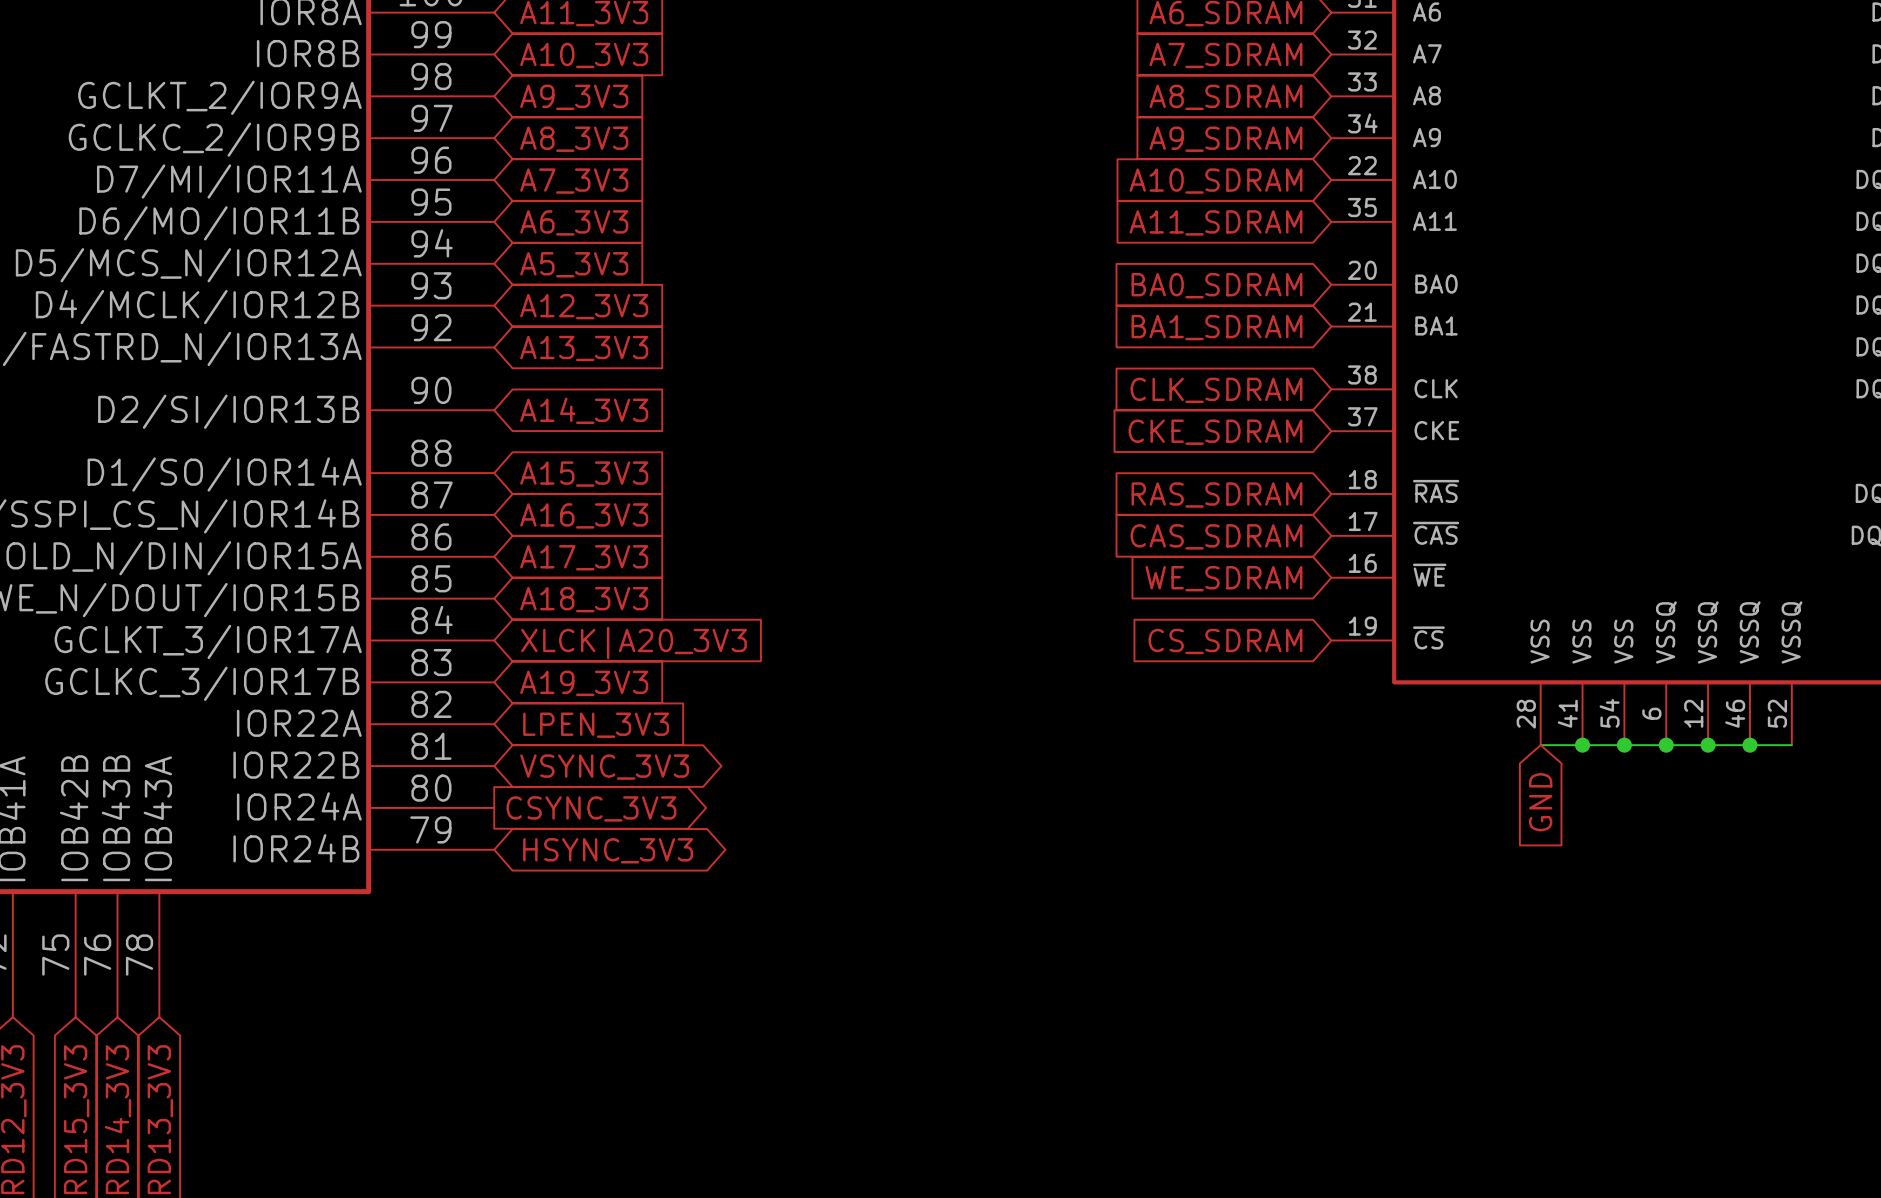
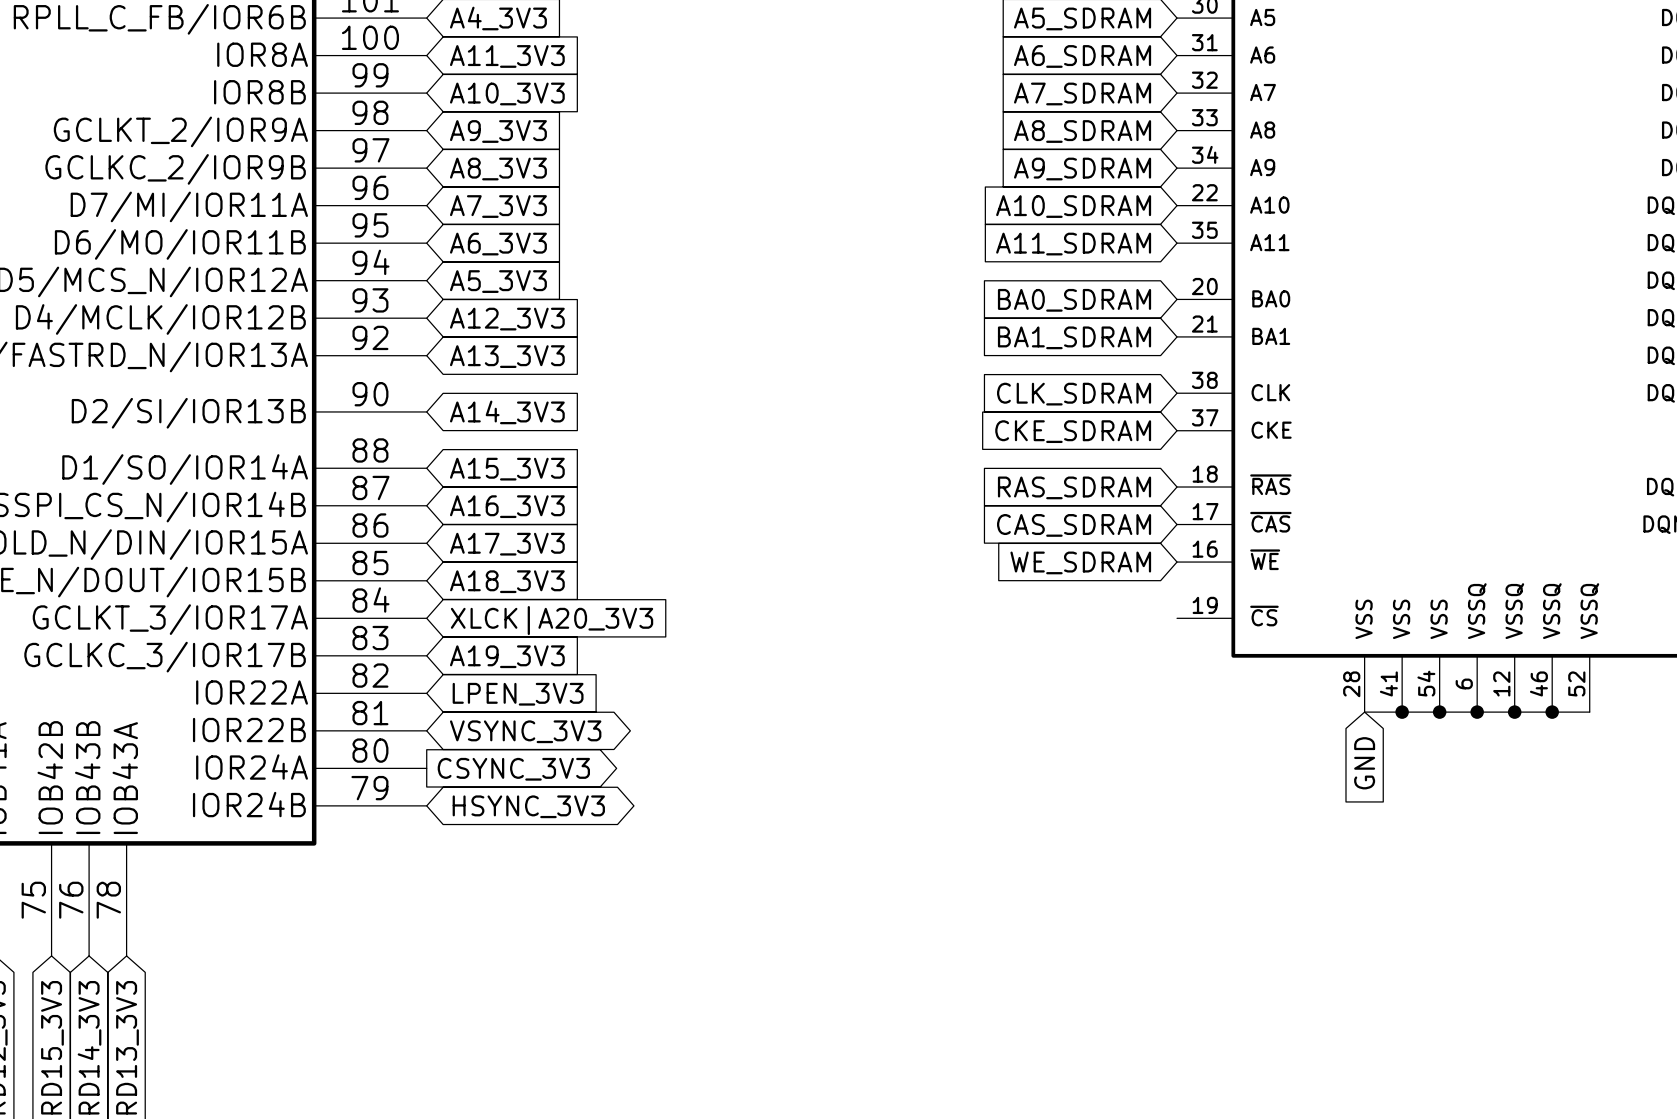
global label: CS_SDRAM (1225, 641) -> none

